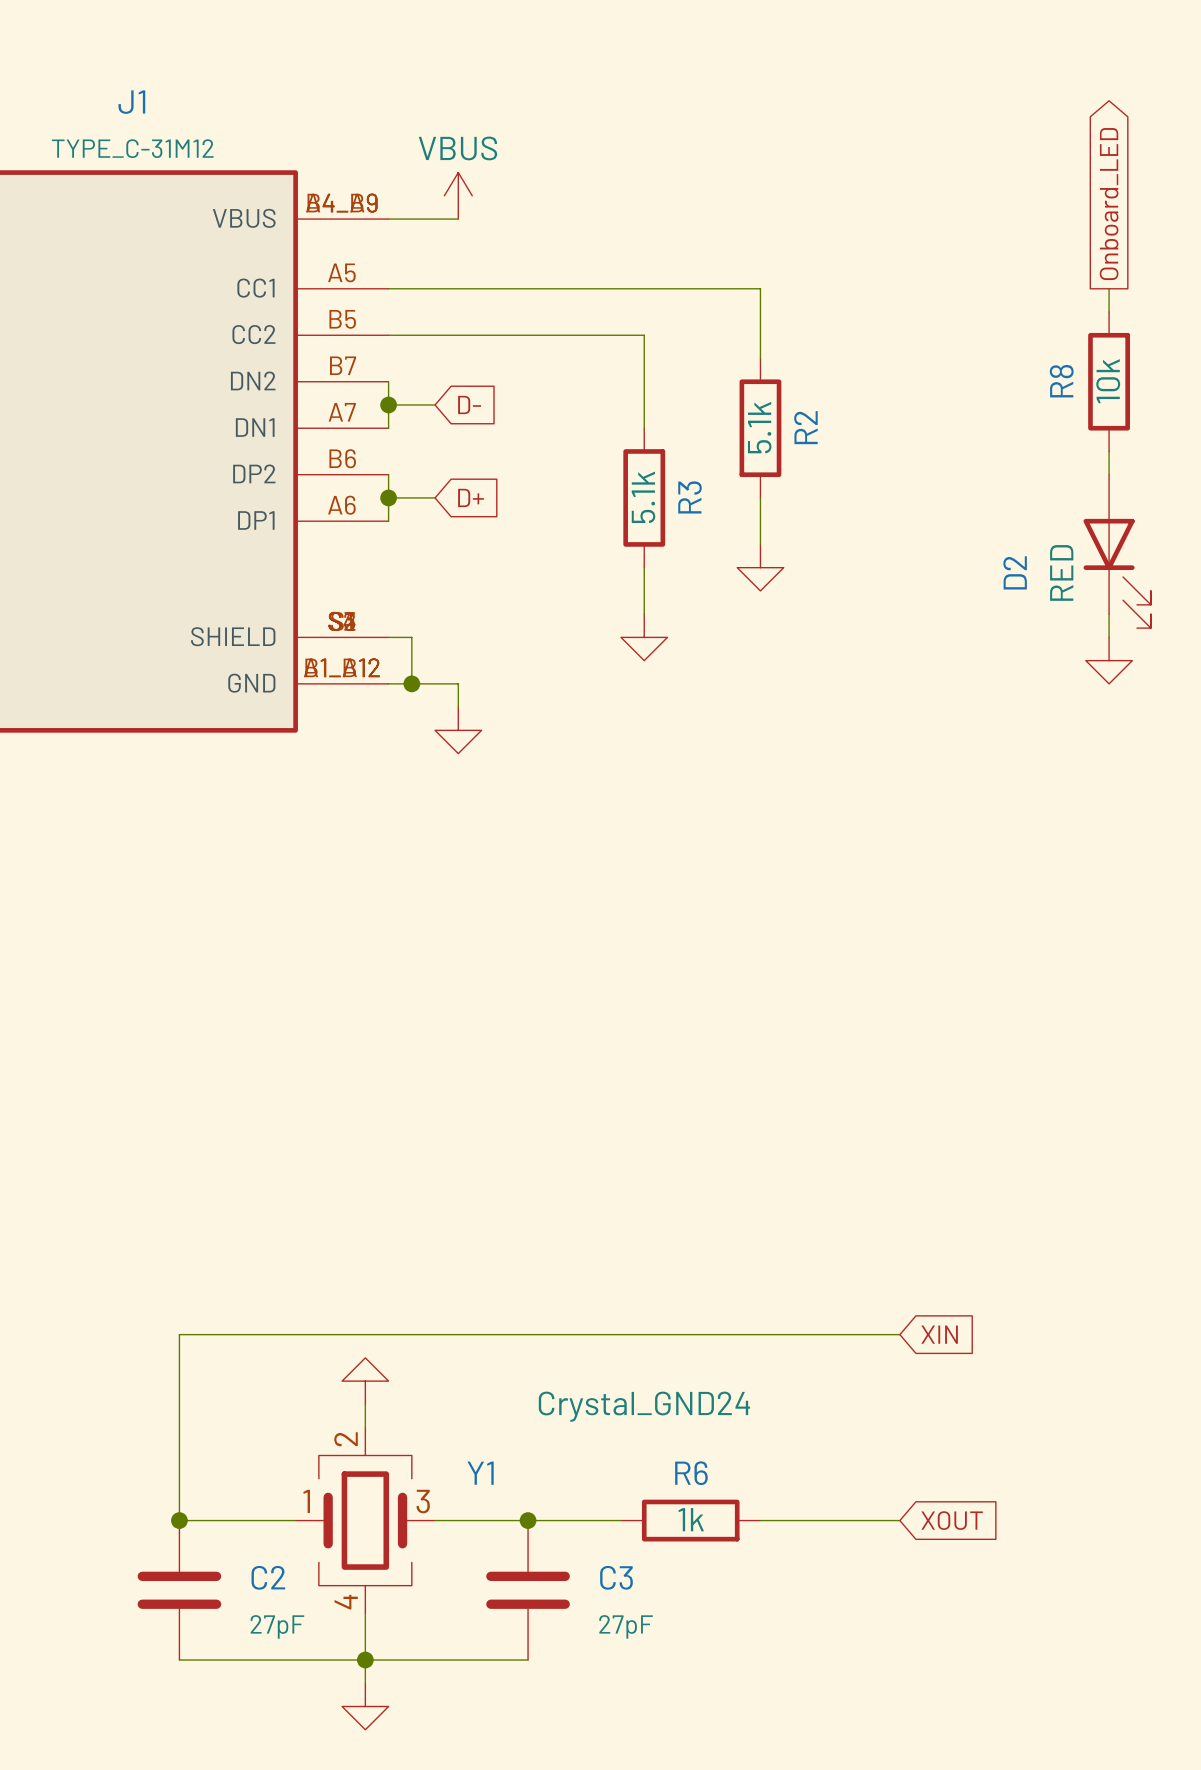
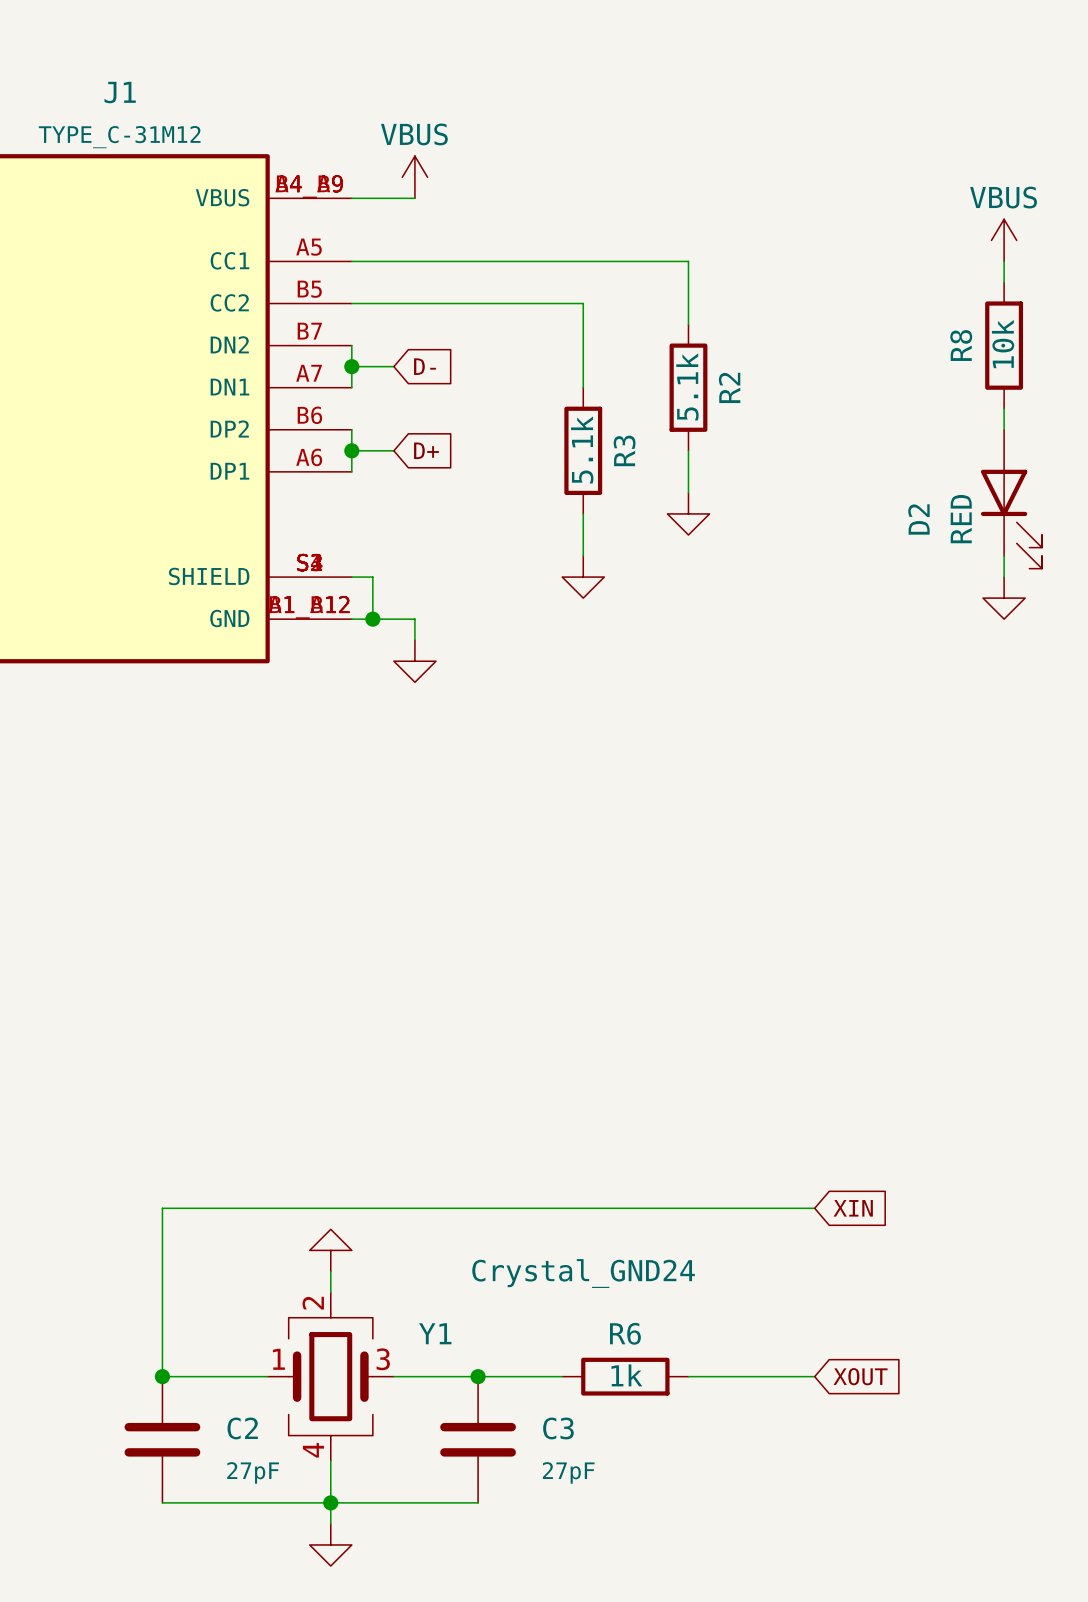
global label: Onboard_LED (1109, 204) -> none
power symbol: none -> VBUS (1004, 240)

